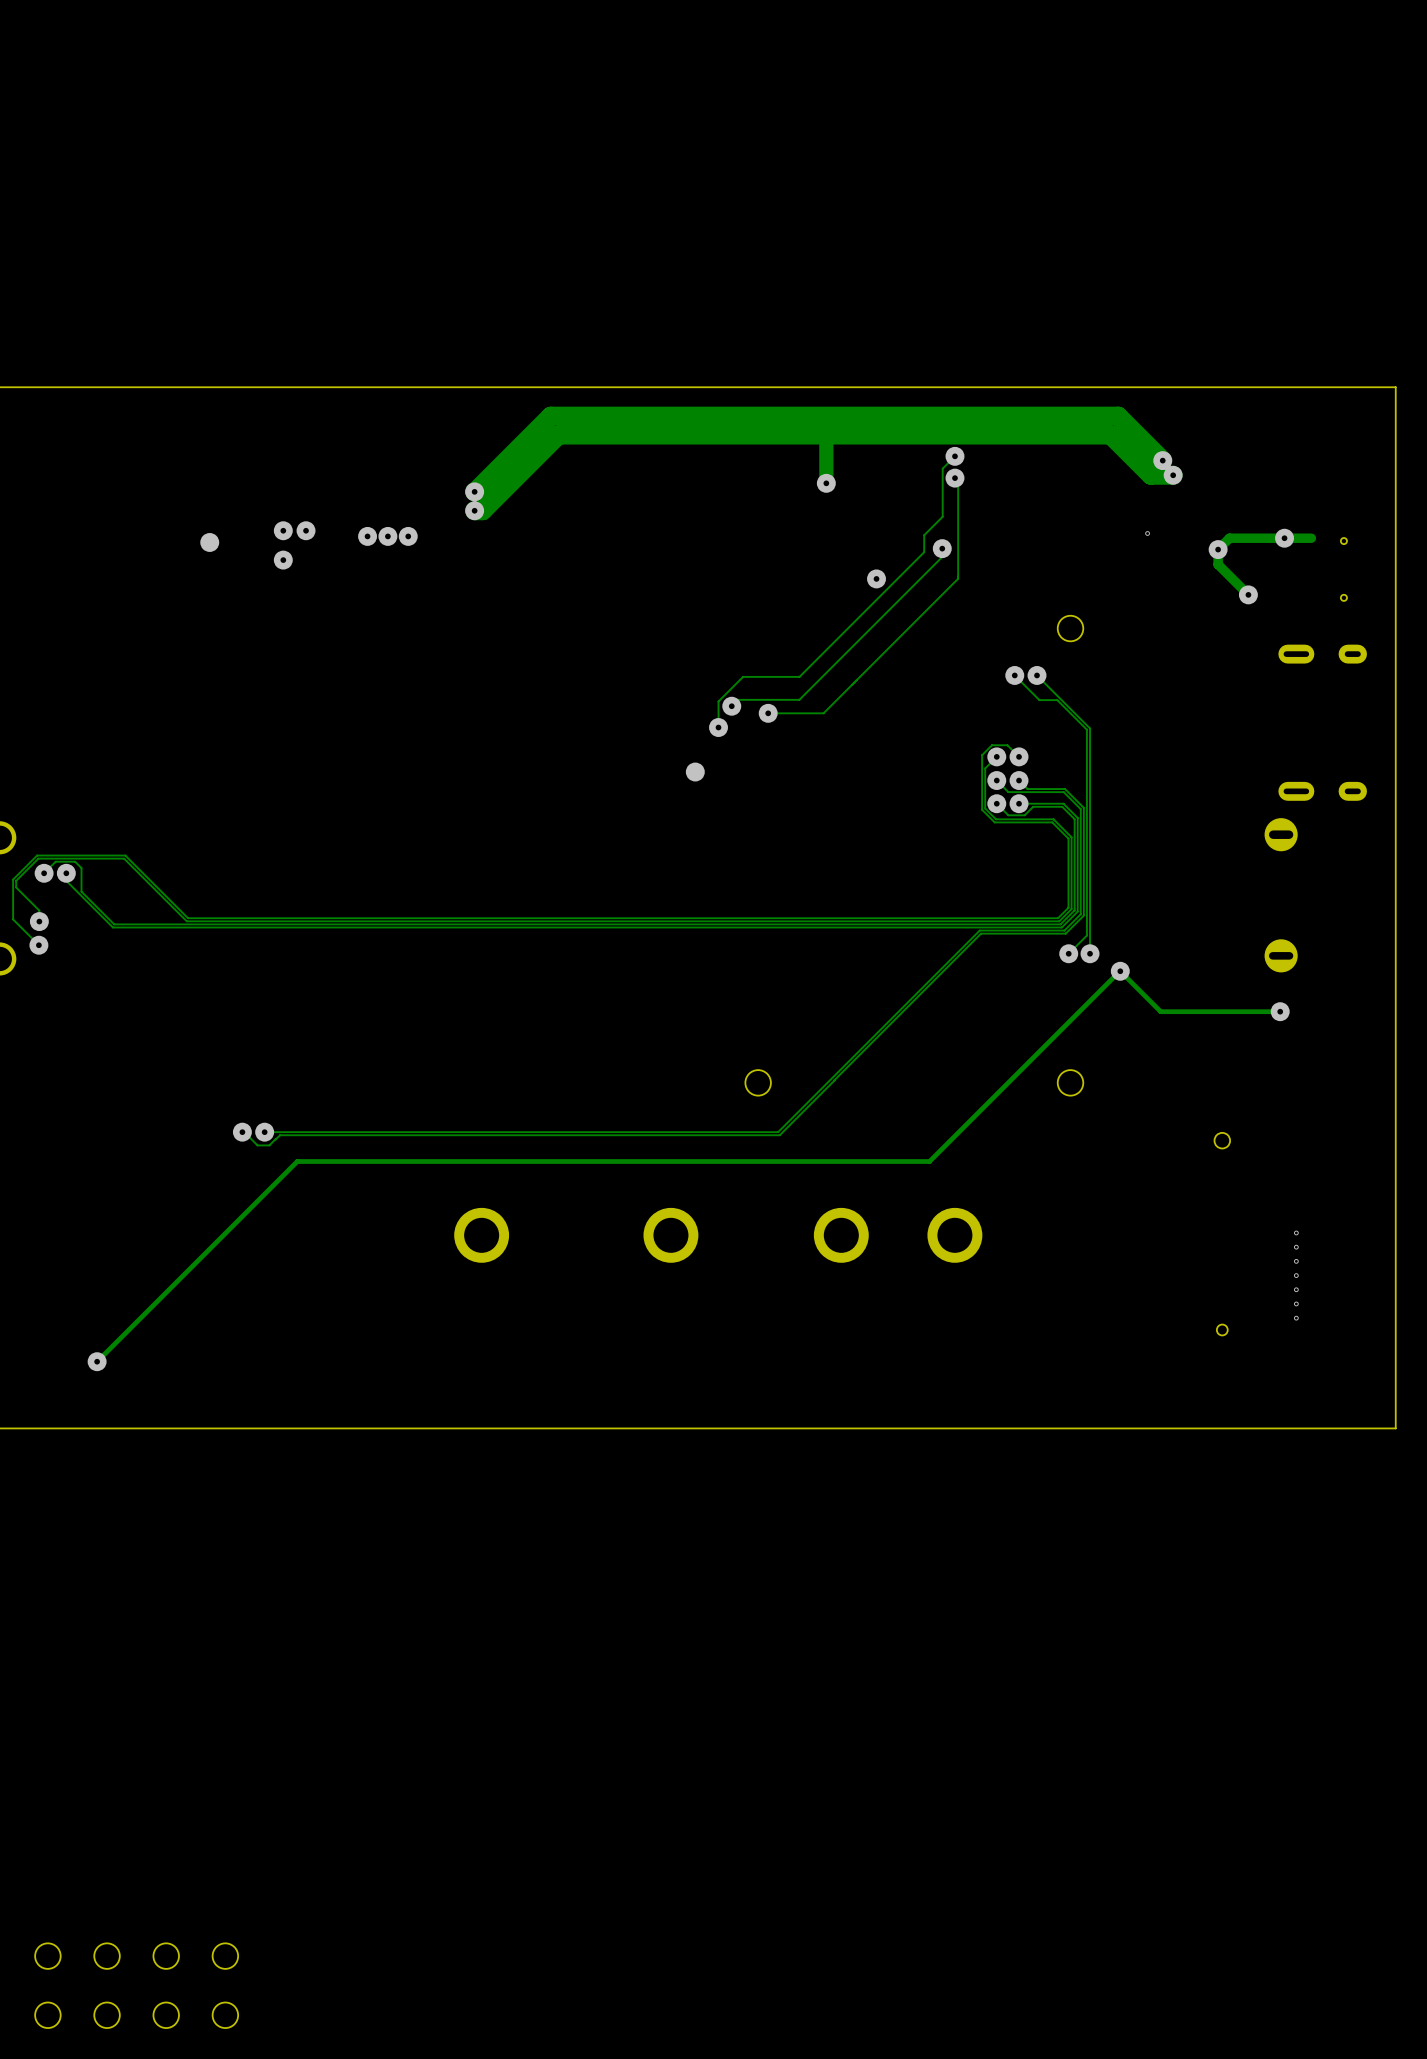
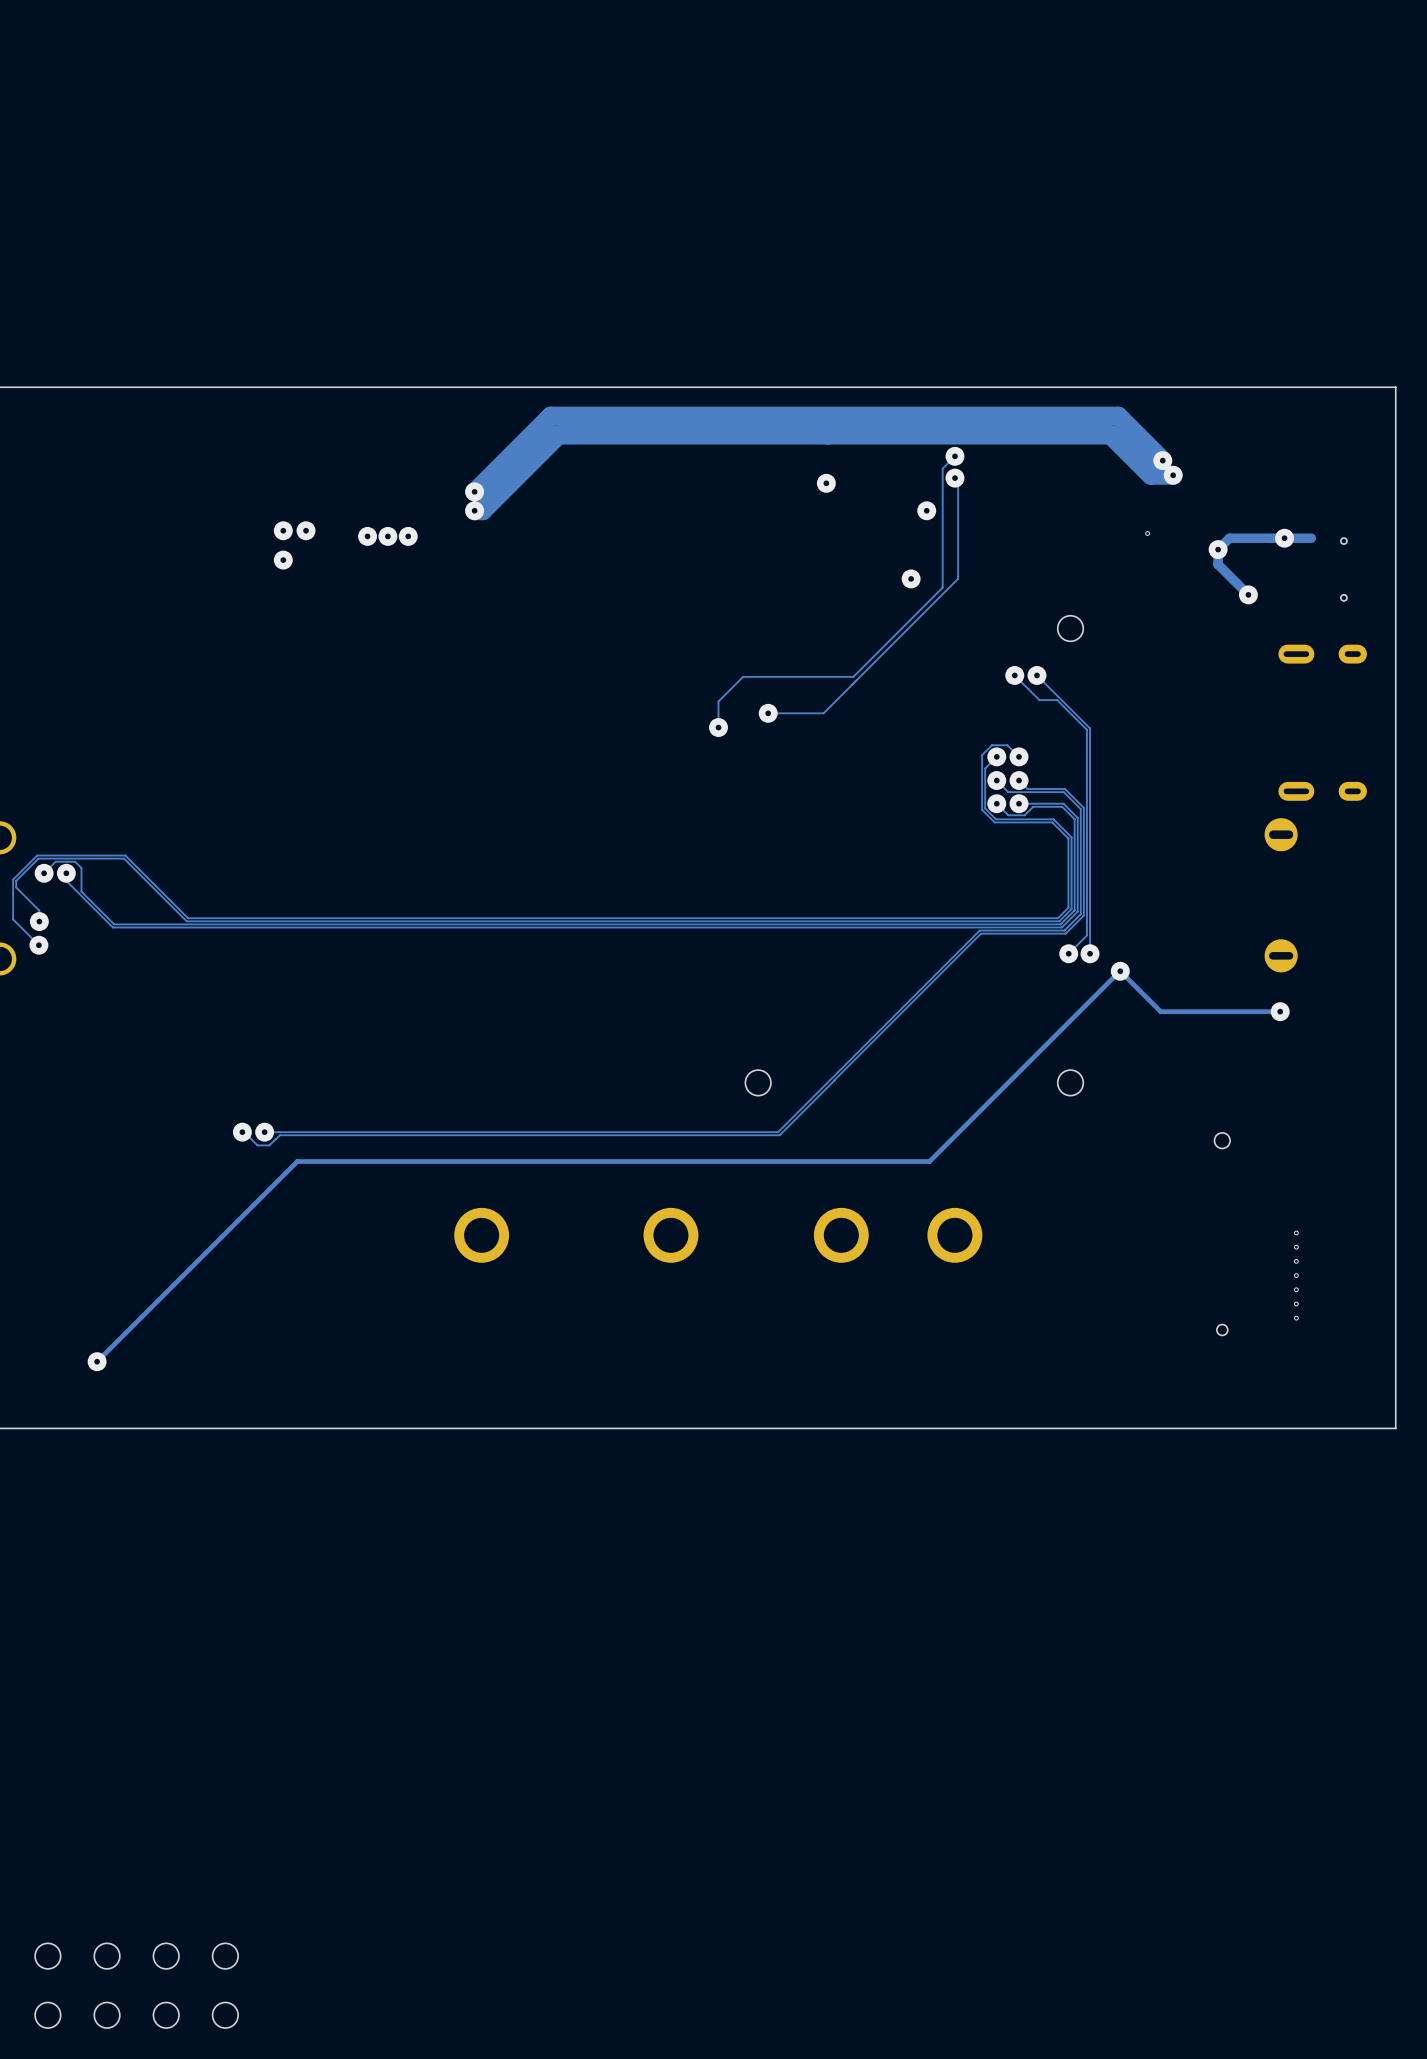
track: (826, 436) (826, 483) -> none
via: none -> (926, 510)
track: (942, 516) (924, 535) (924, 552) (799, 676) -> (942, 516) (942, 587) (853, 676) (799, 676)
via: (209, 542) -> none
track: (942, 548) (942, 556) (799, 699) (738, 699) (731, 706) -> none
via: (942, 548) -> none
via: (876, 578) -> none
via: none -> (911, 578)
via: (731, 706) -> none
via: (695, 772) -> none

